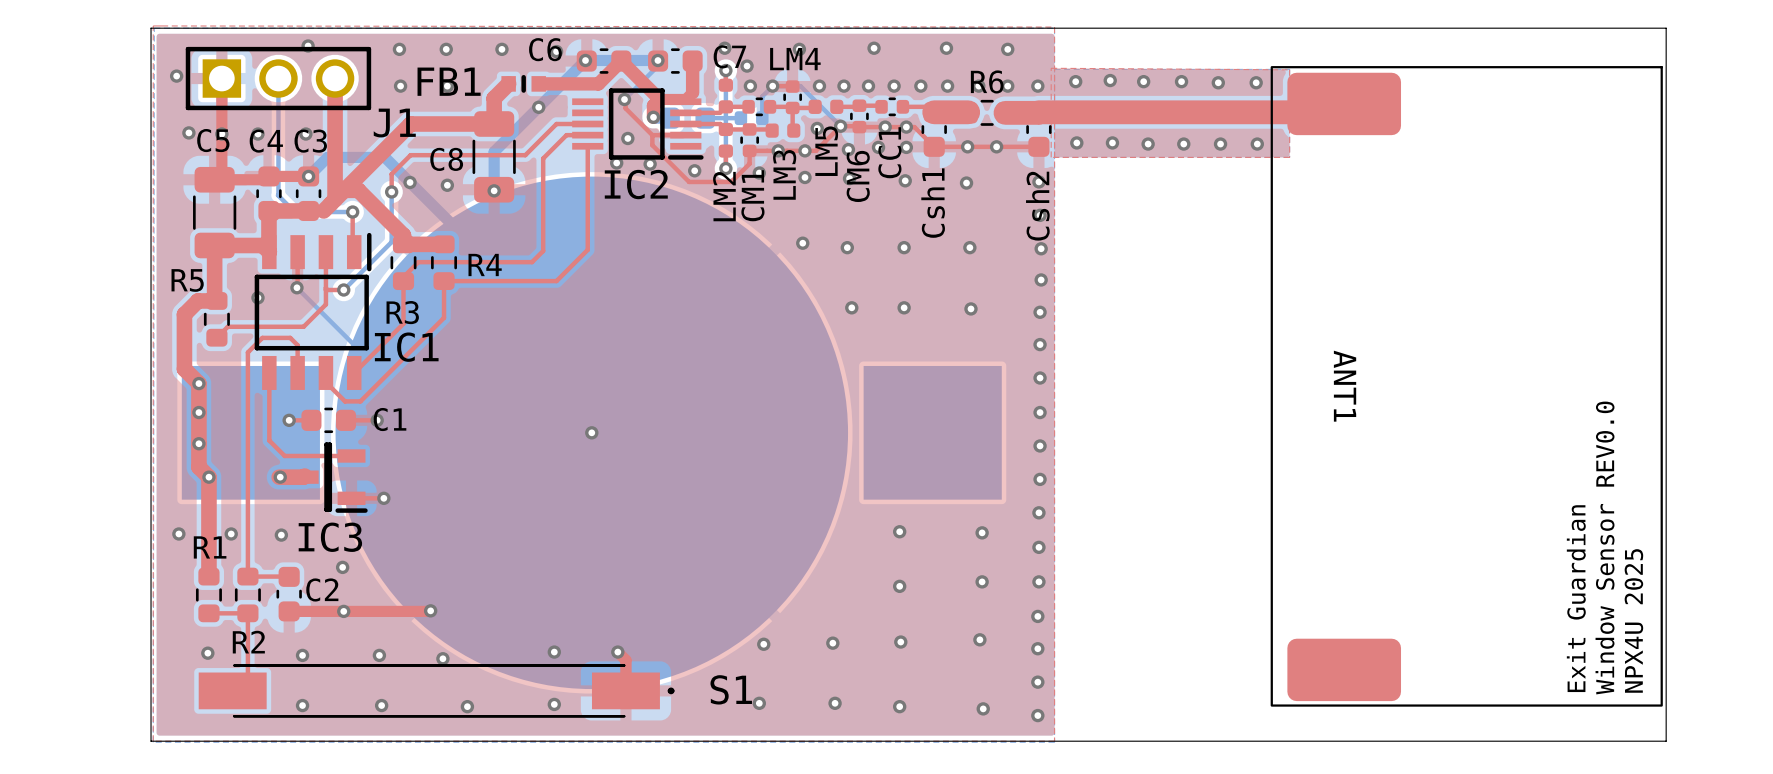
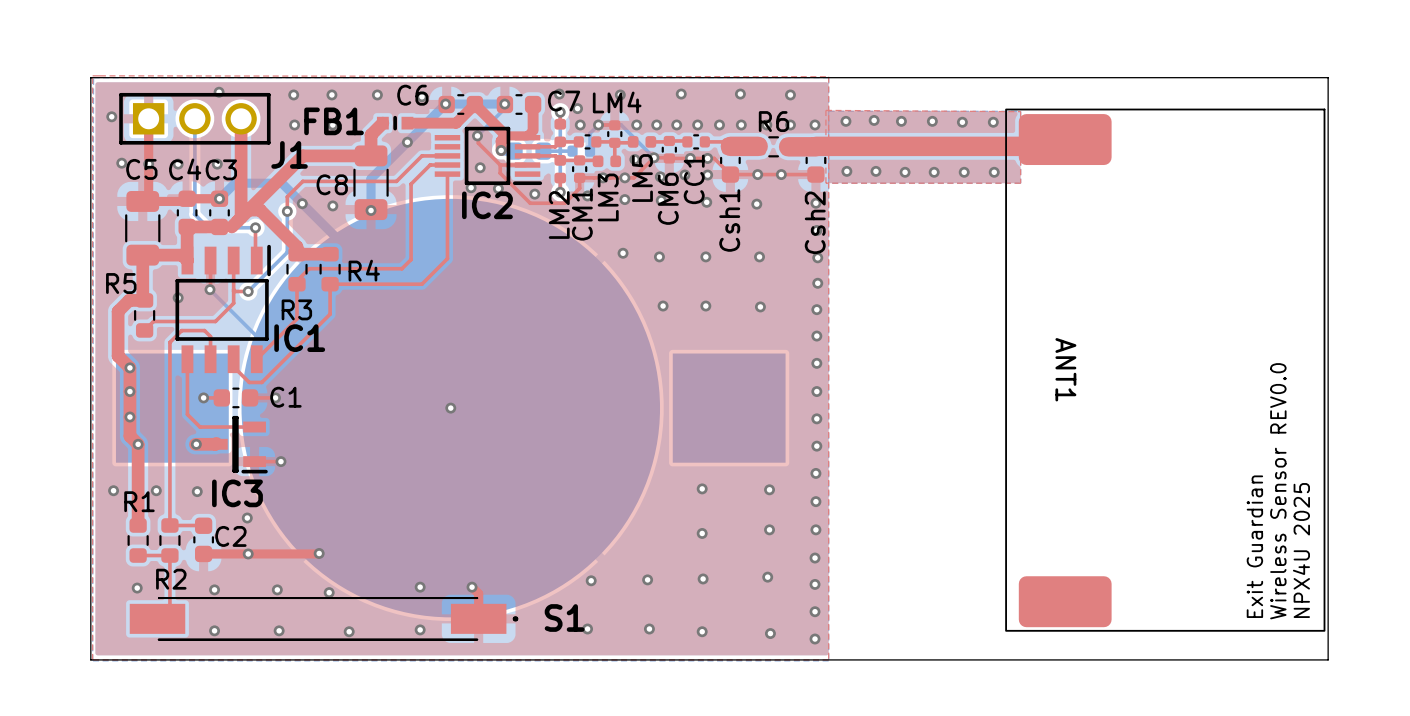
text: Window Sensor REV0.0 (1605, 548) -> Wireless Sensor REV0.0 (1278, 491)

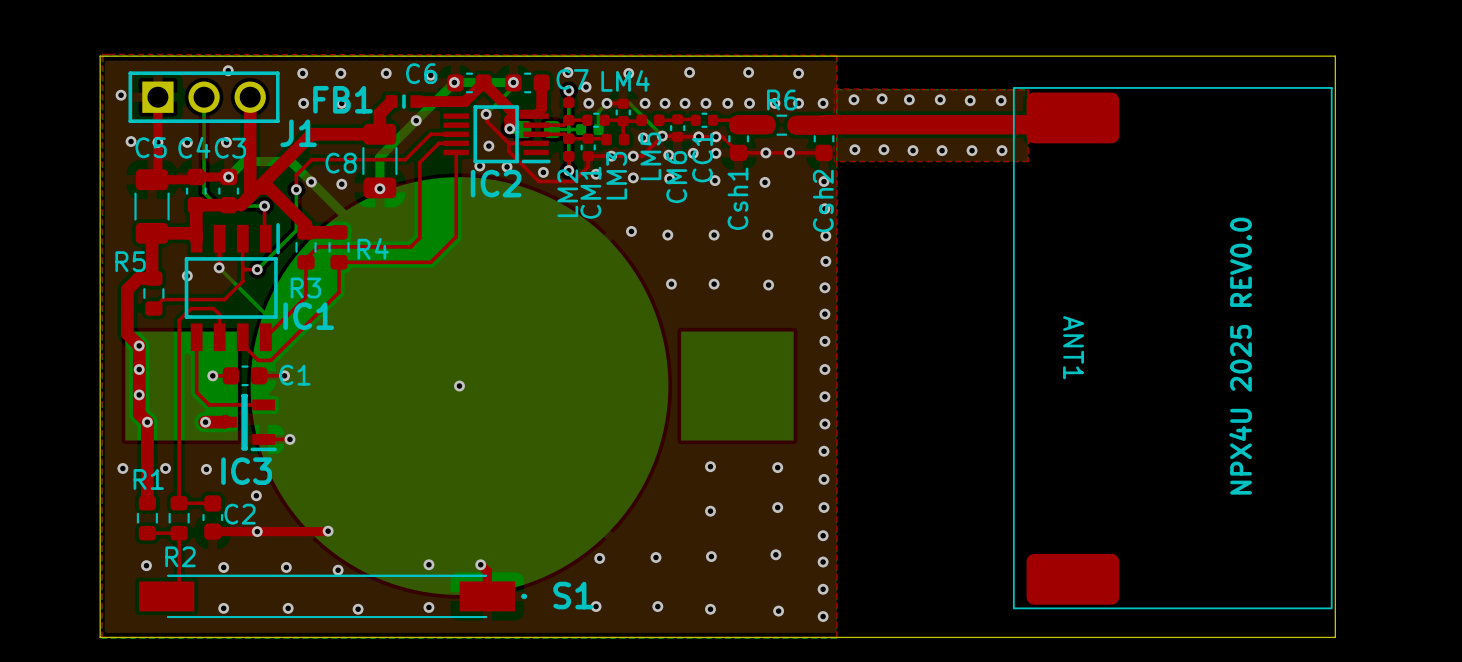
text: none -> NPX4U 2025 REV0.0 (1240, 356)
text: Wireless Sensor REV0.0 (1278, 491) -> none
text: Exit Guardian (1254, 546) -> none
text: NPX4U 2025 (1301, 550) -> none

